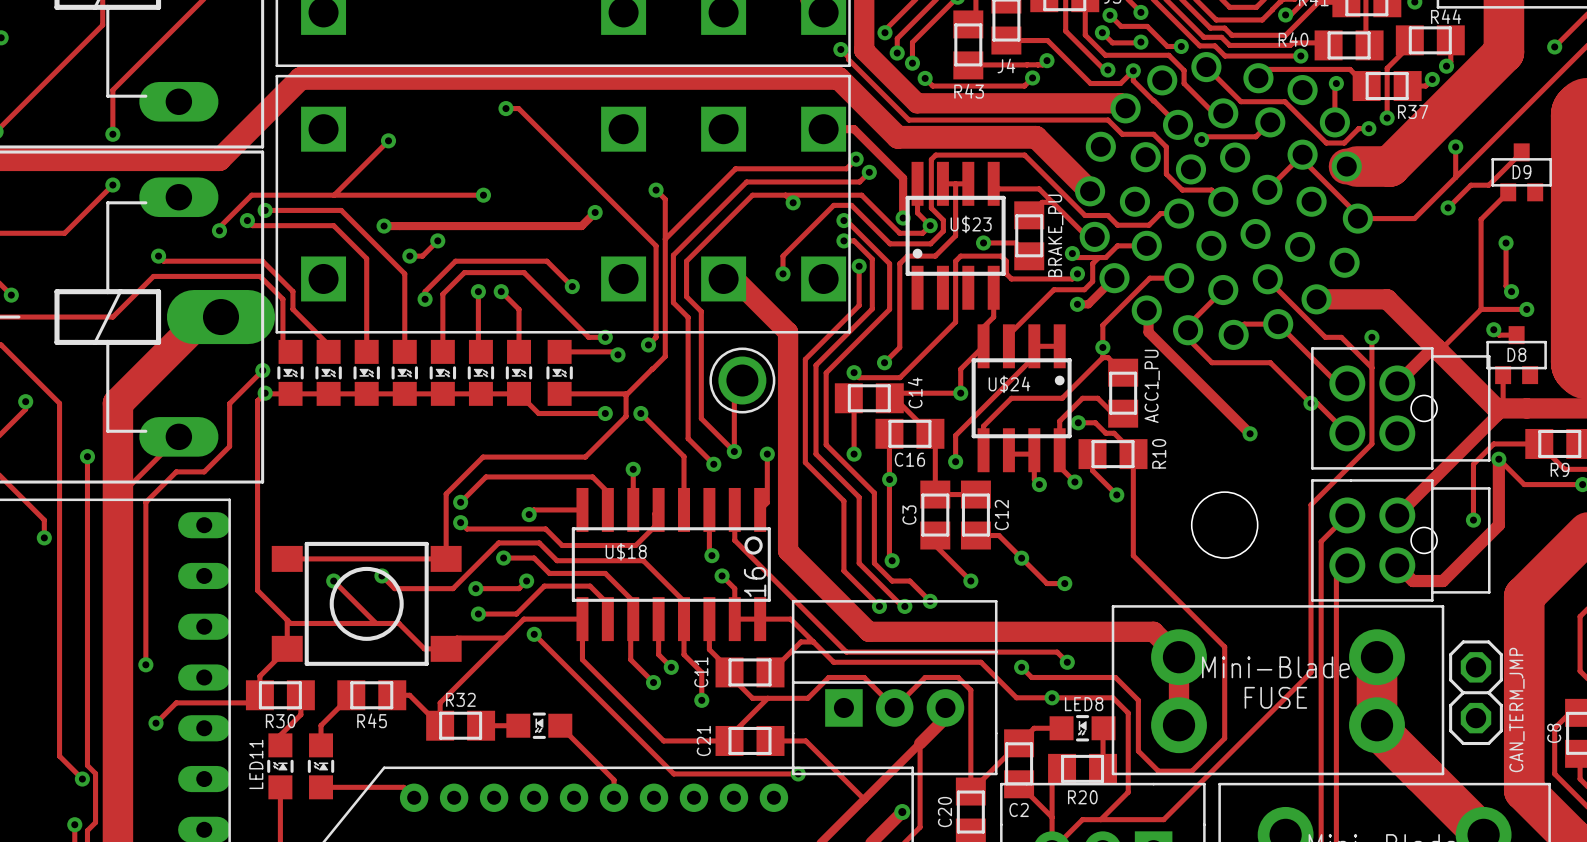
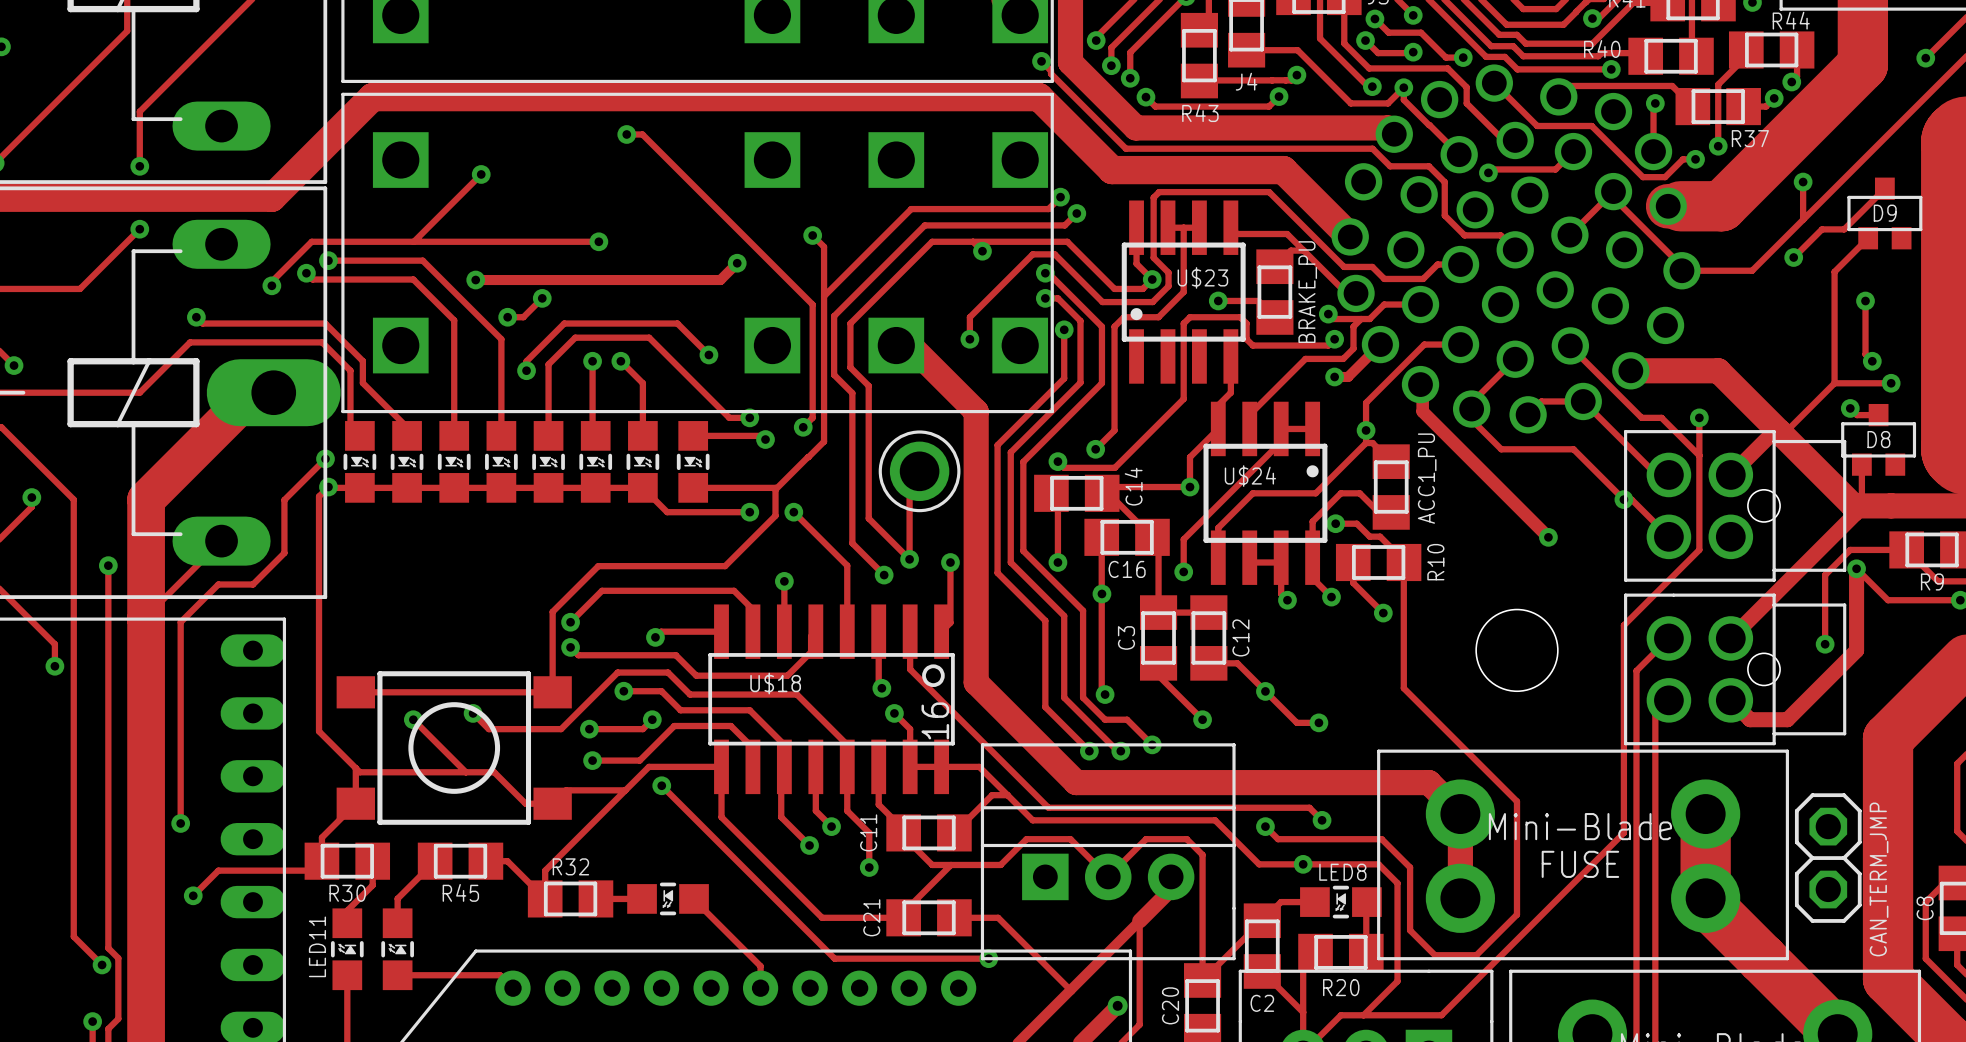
track: (823, 129) (854, 129) (903, 178) (903, 218) -> none
via: (903, 218) -> none

